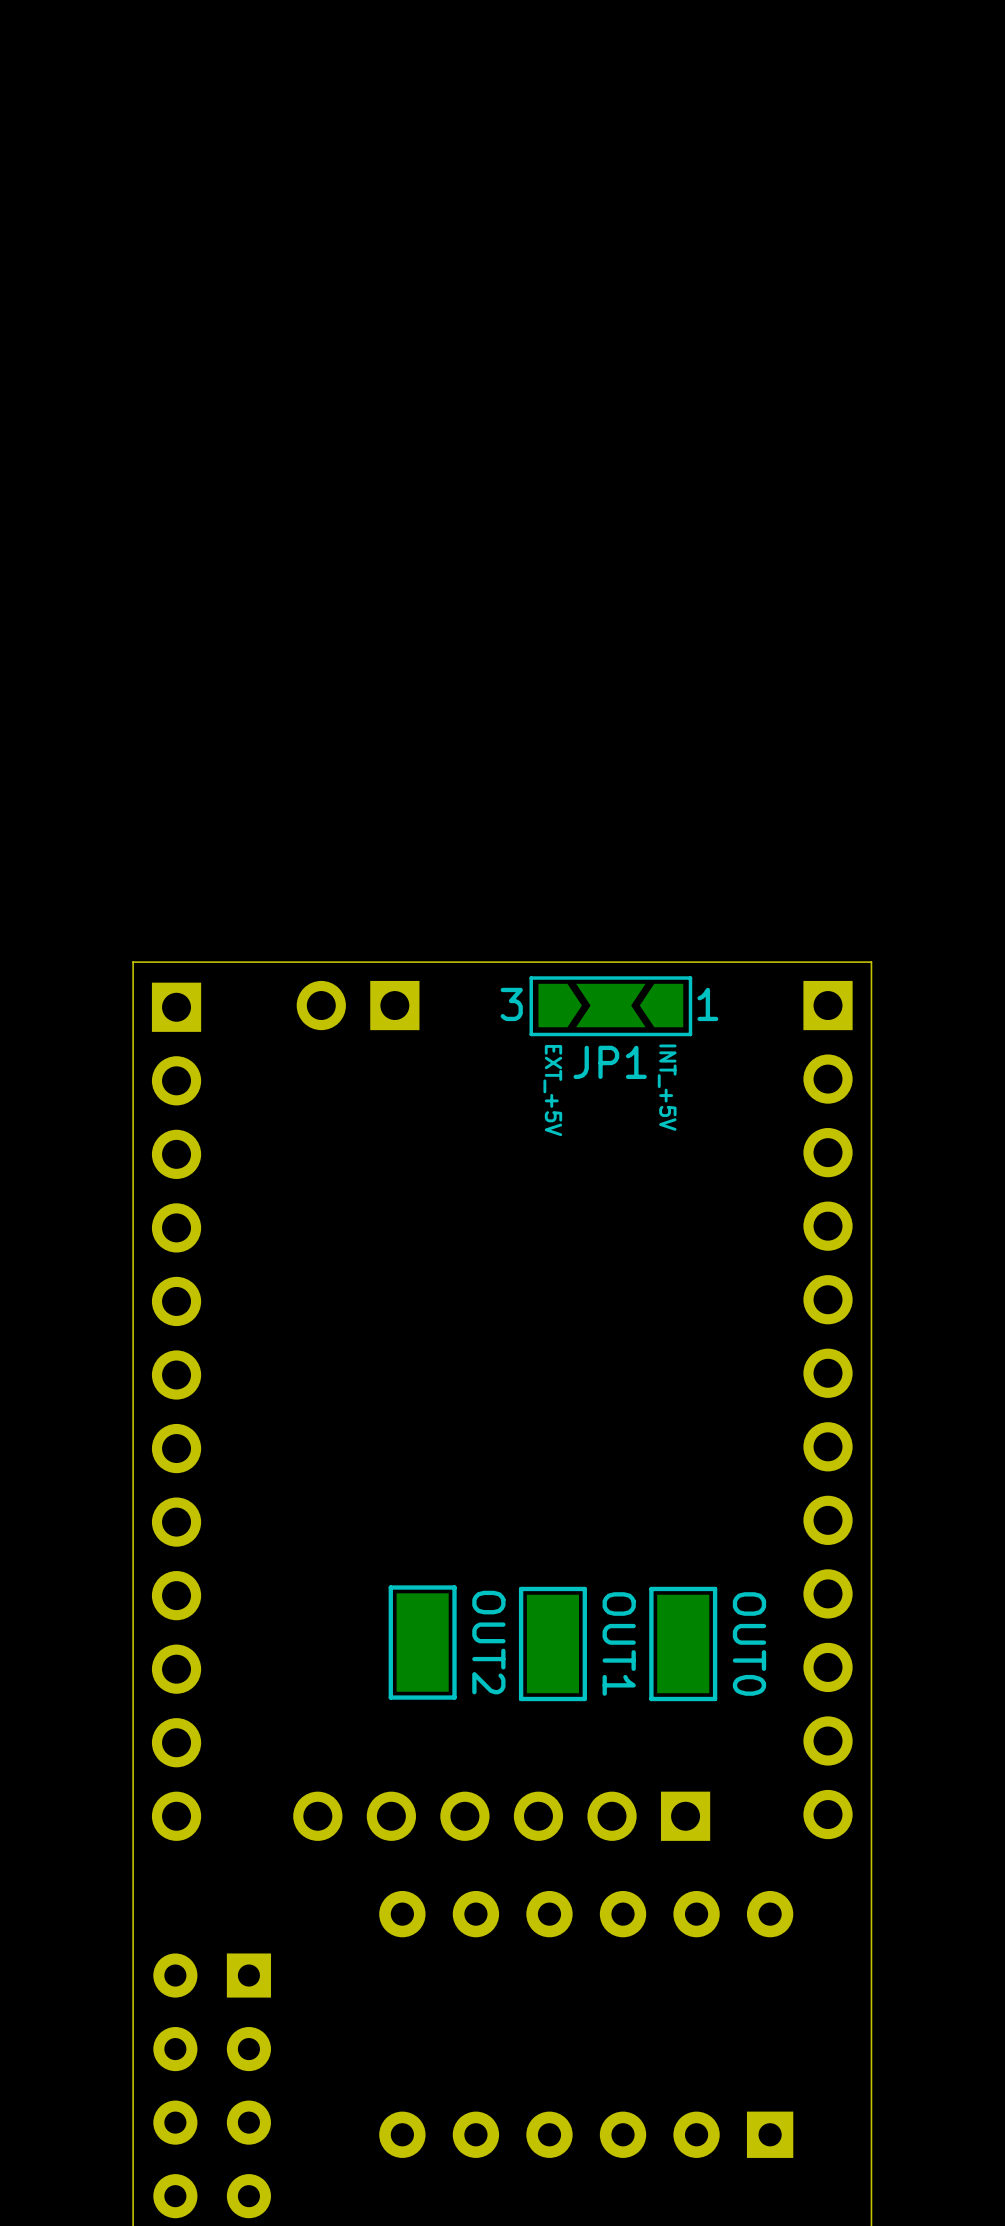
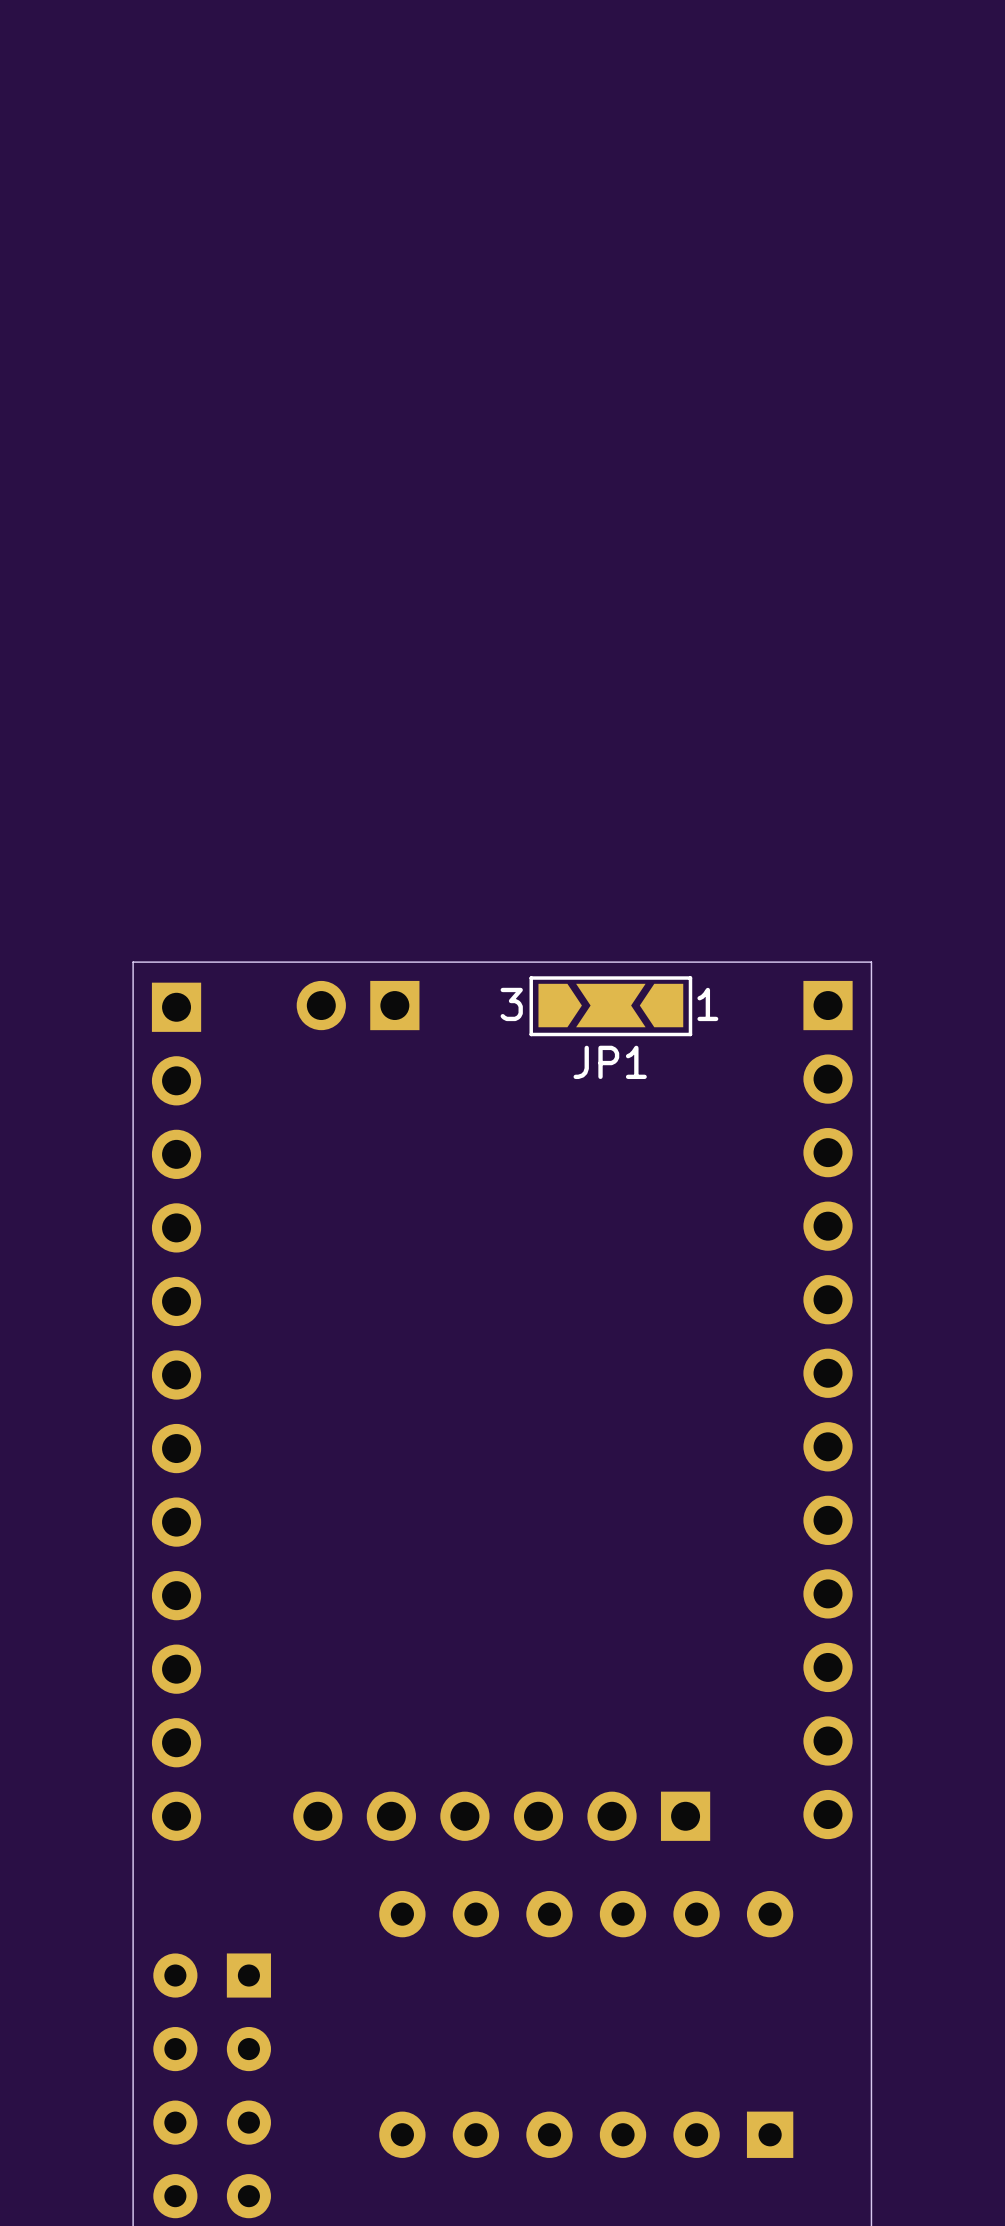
text: INT_+5V (667, 1087) -> none
text: EXT_+5V (552, 1090) -> none
OUT2: (422, 1642) -> none
OUT1: (552, 1643) -> none
OUT0: (683, 1643) -> none

